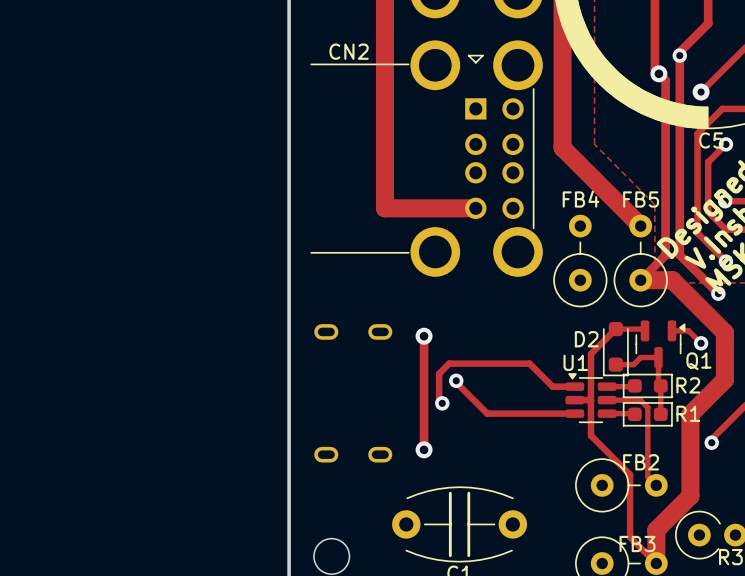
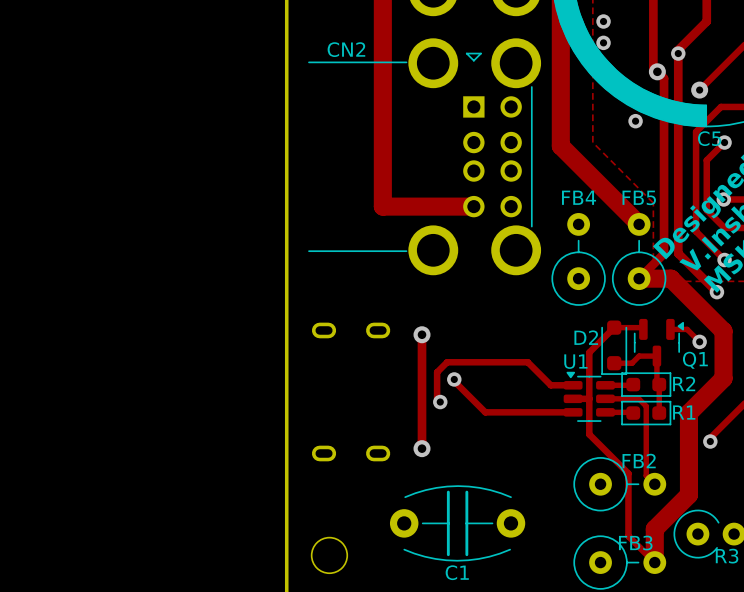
via: none -> (603, 21)
via: none -> (603, 42)
via: none -> (635, 121)

